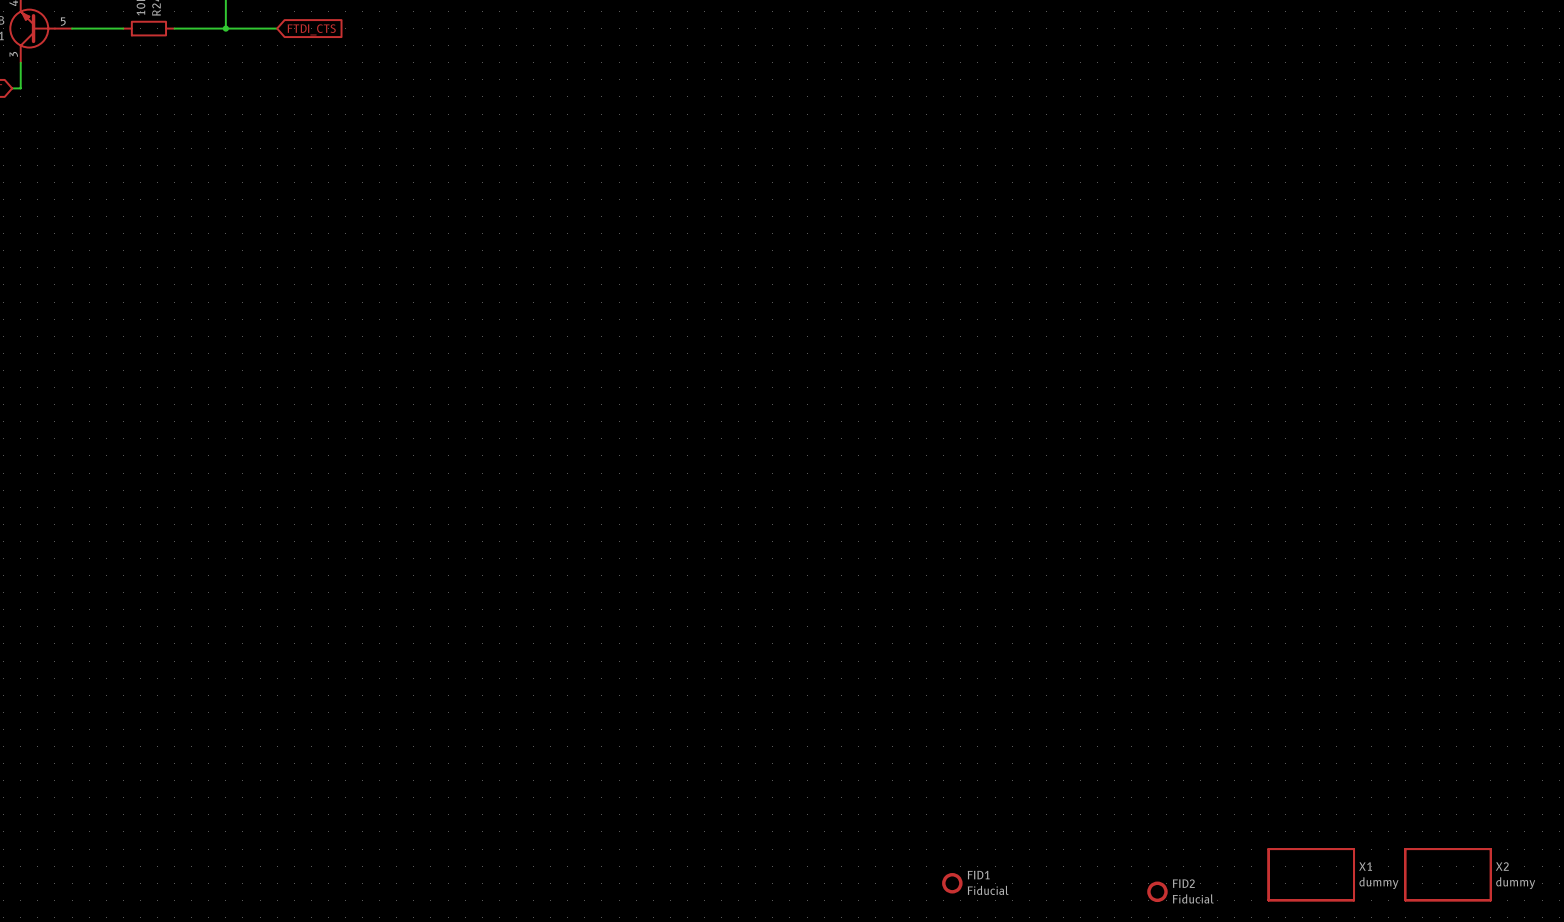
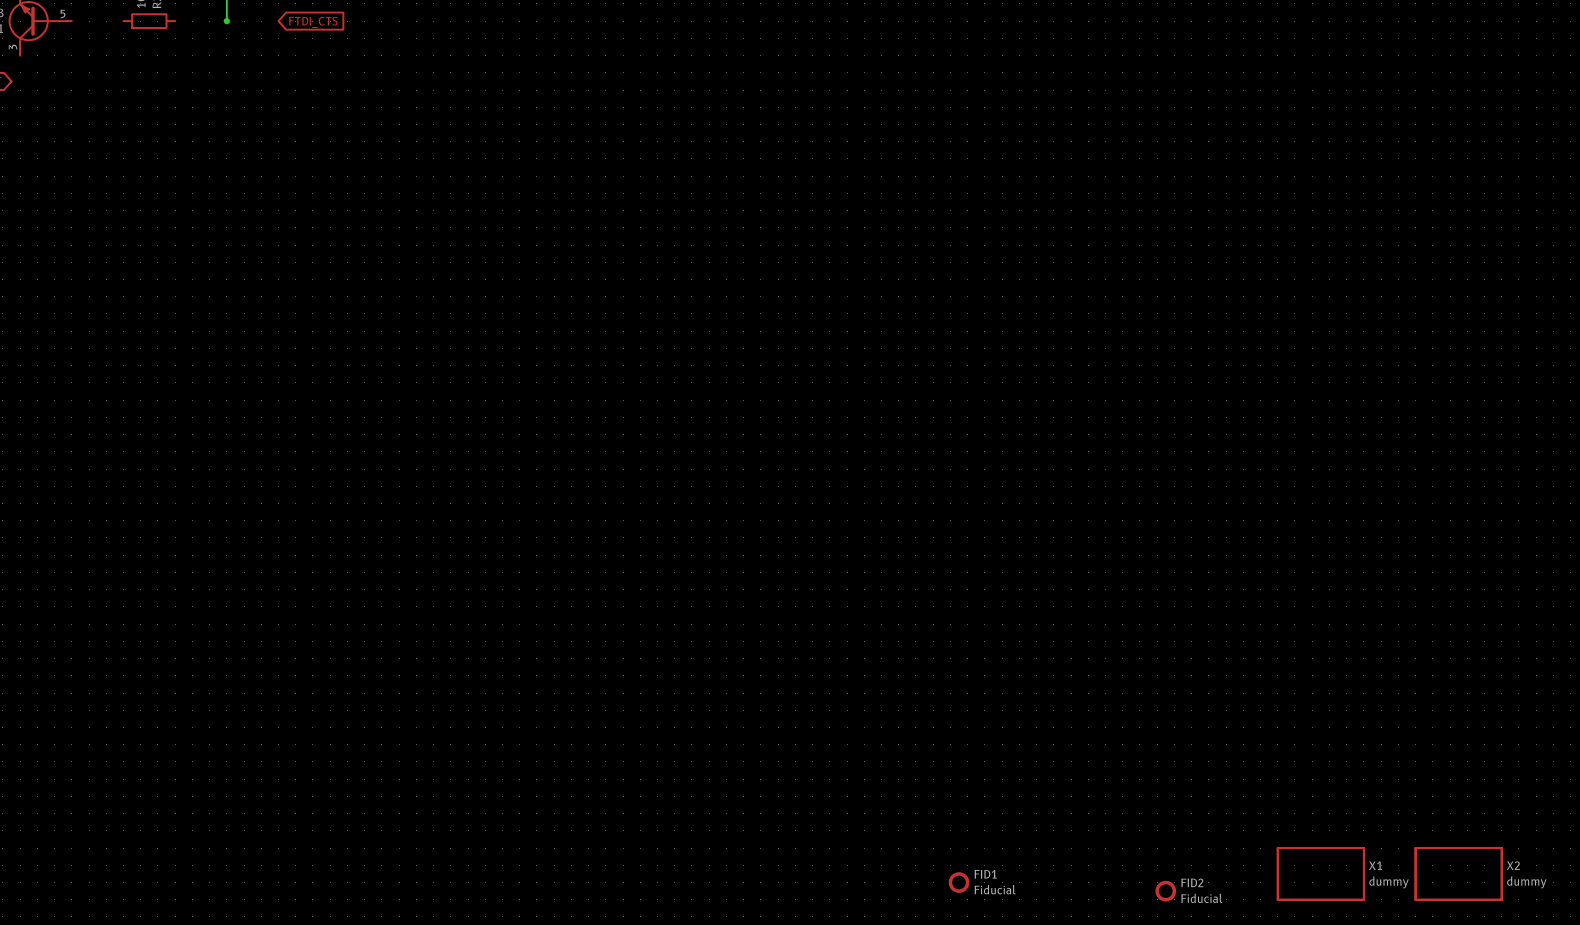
wire: (72, 28) (123, 28) -> none
wire: (174, 28) (277, 28) -> none
wire: (20, 62) (20, 88) (12, 88) -> none

